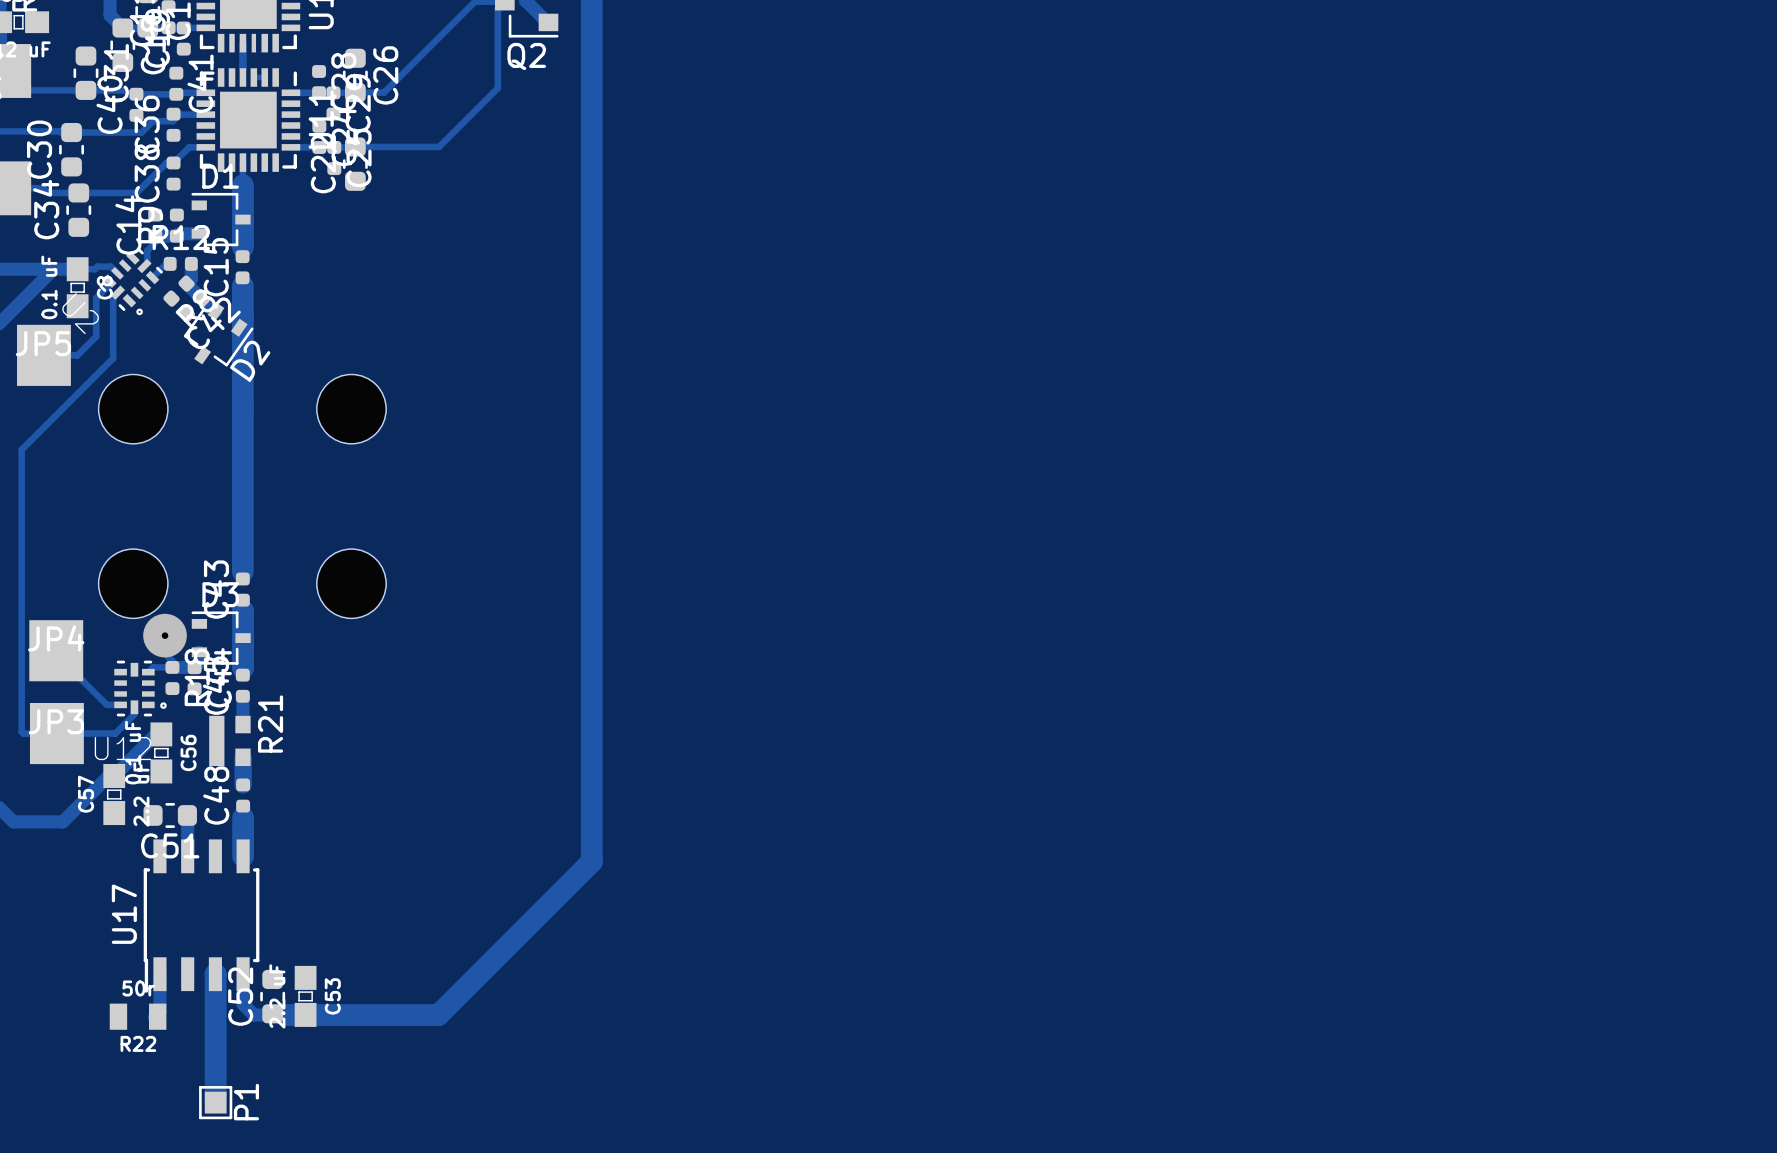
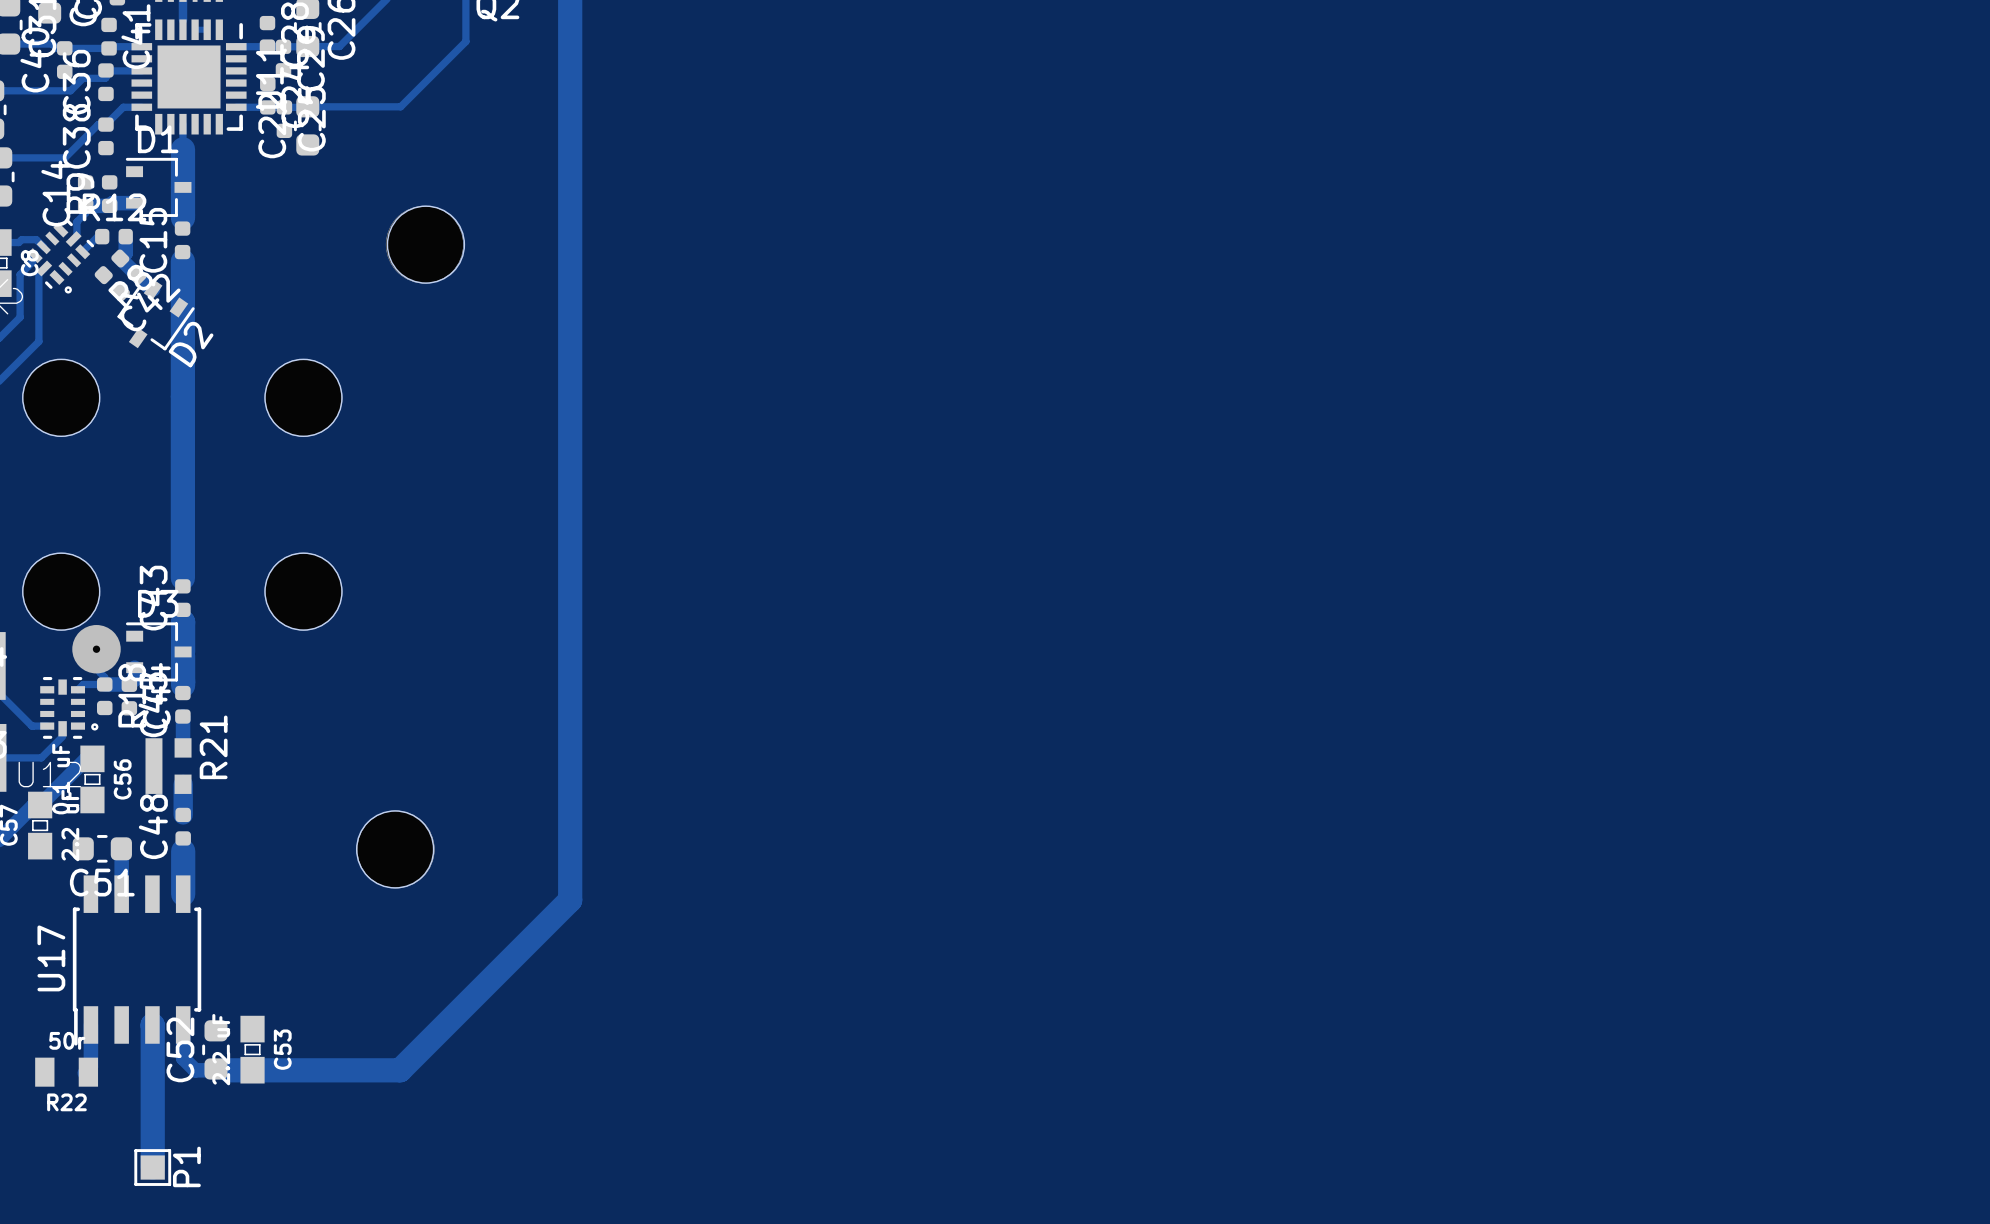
round board edge: none -> [386, 205, 465, 284]
via: none -> (424, 244)
round board edge: none -> [356, 810, 435, 889]
via: none -> (395, 849)

